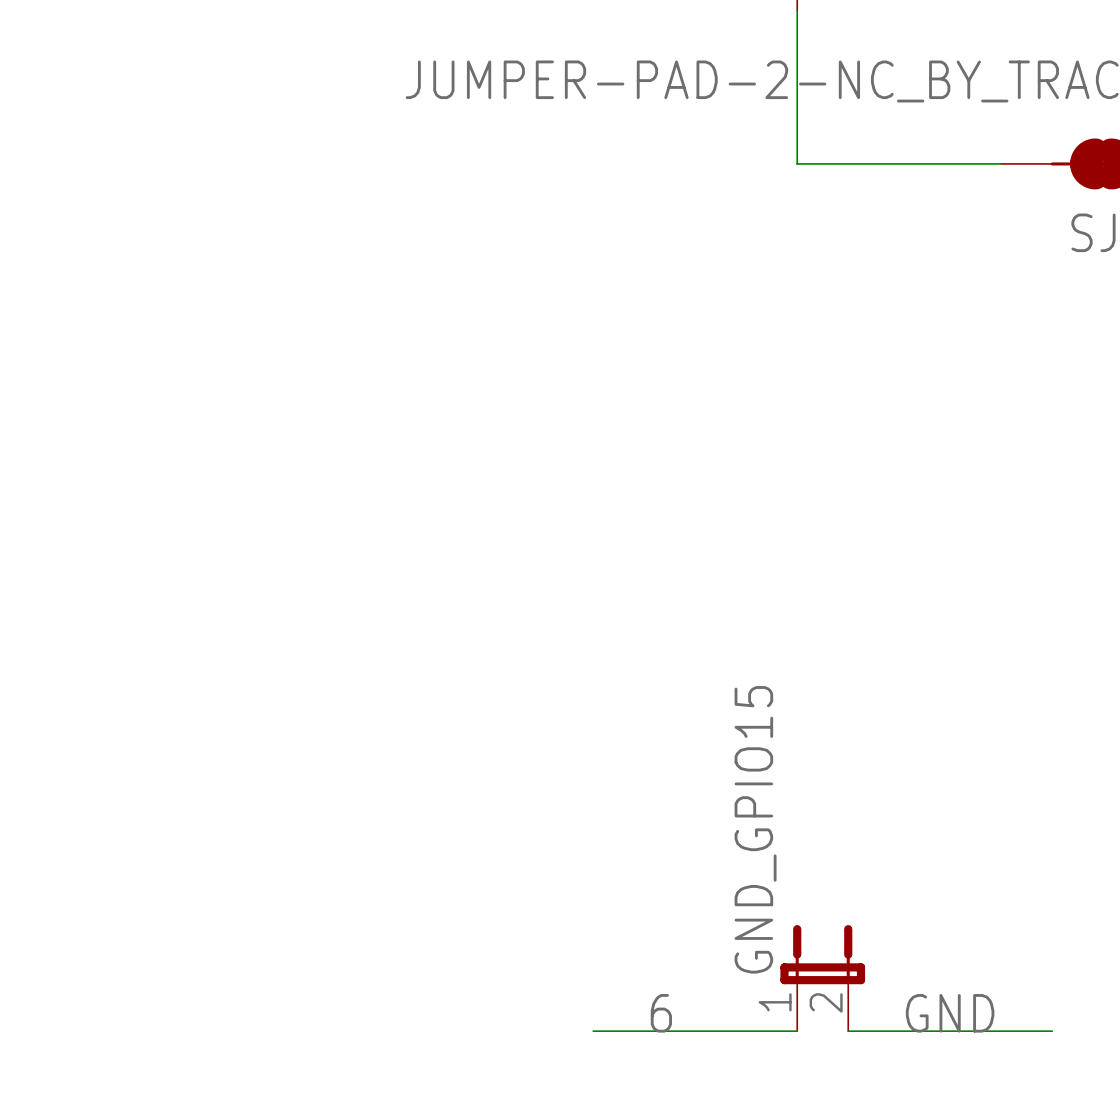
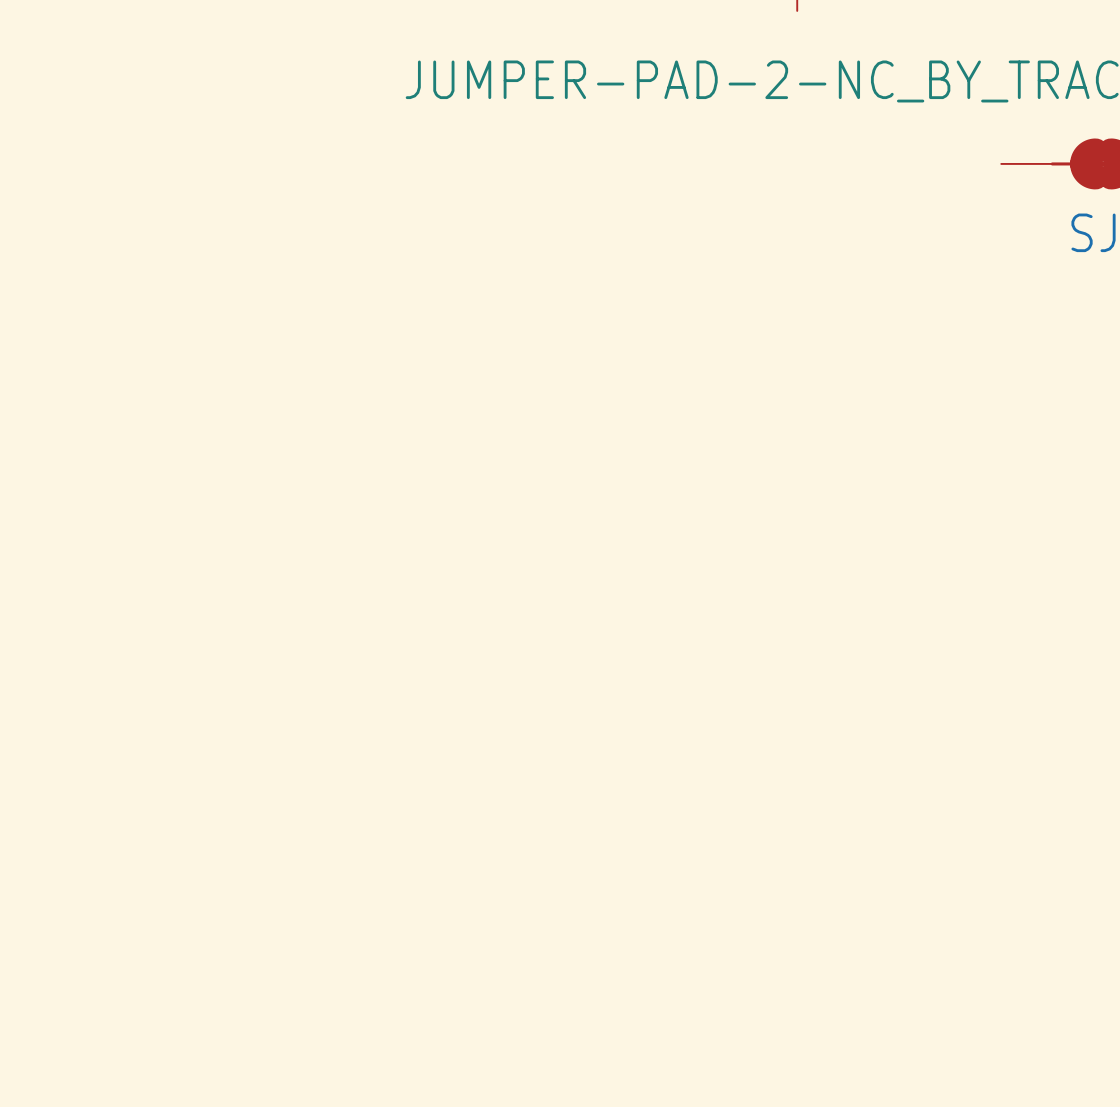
wire: (797, 10) (797, 163) (1001, 163) -> none
GND_GPIO15: (822, 978) -> none
label: 6 (661, 1013) -> none
label: GND (950, 1013) -> none
wire: (593, 1031) (797, 1031) -> none
wire: (848, 1031) (1052, 1031) -> none

